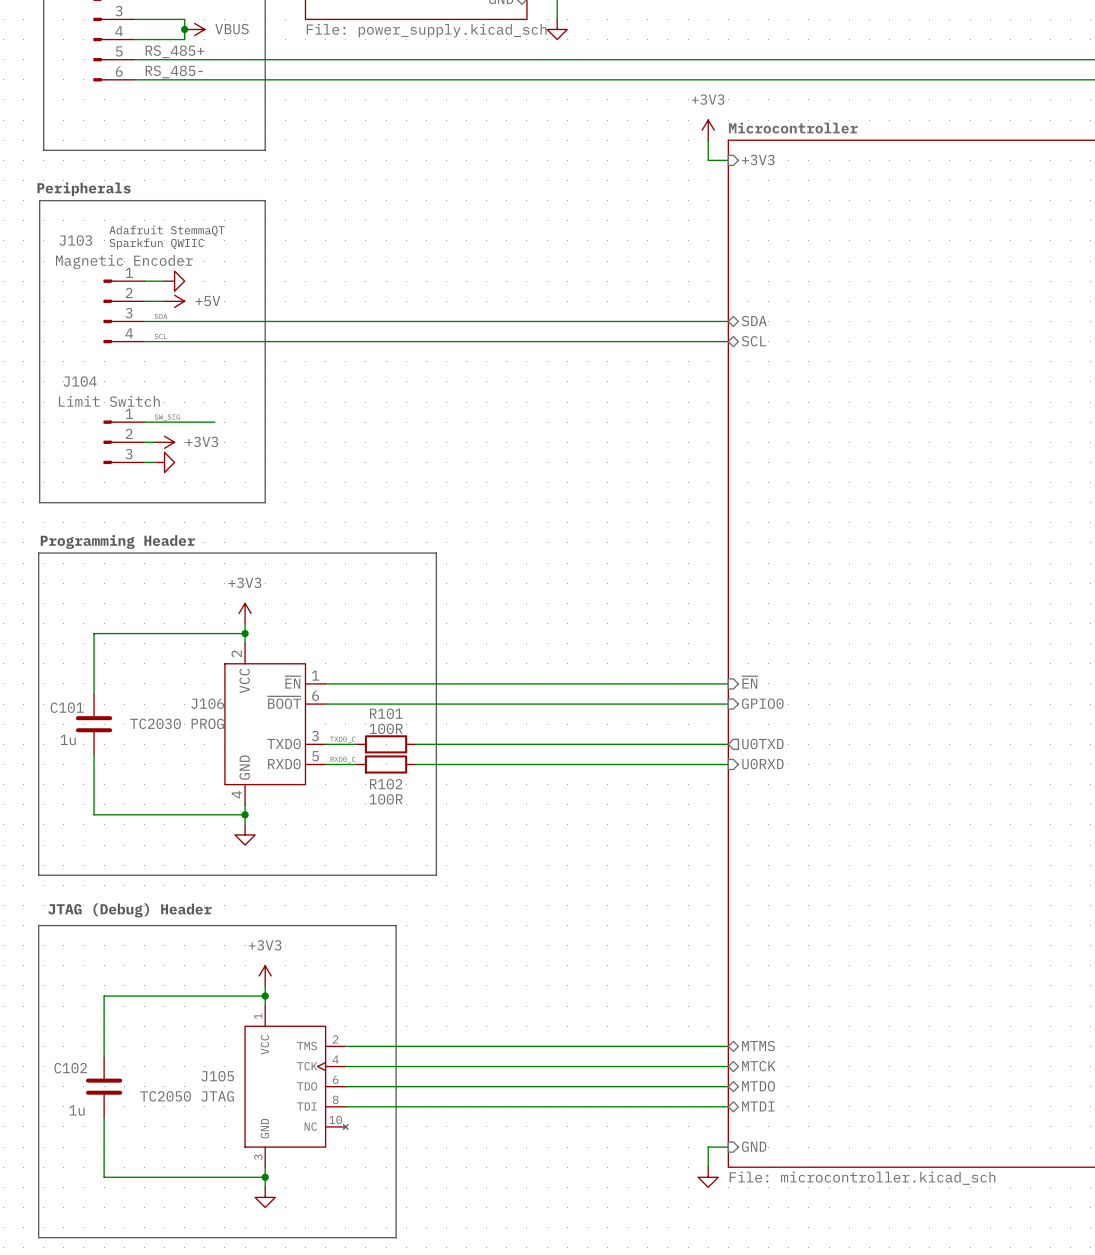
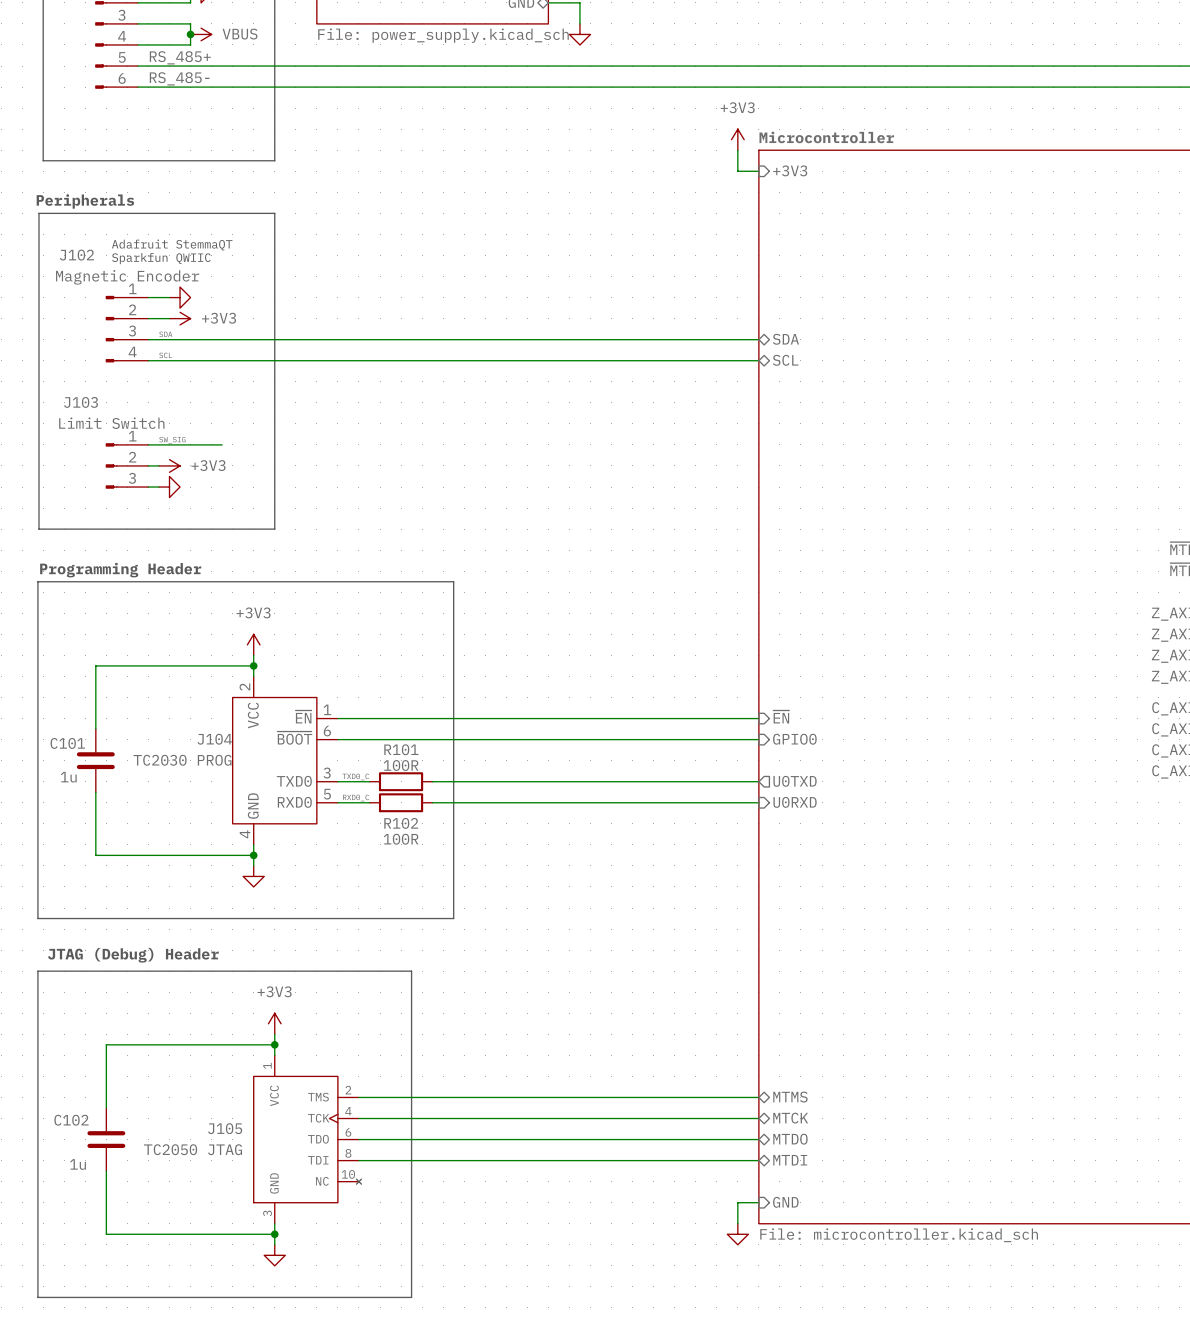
J103 name: J103 (75, 240) -> J102 (76, 255)
power symbol: +5V (174, 301) -> +3V3 (180, 318)
J104 name: J104 (80, 381) -> J103 (81, 402)
J106 name: J106 (207, 703) -> J104 (214, 739)

